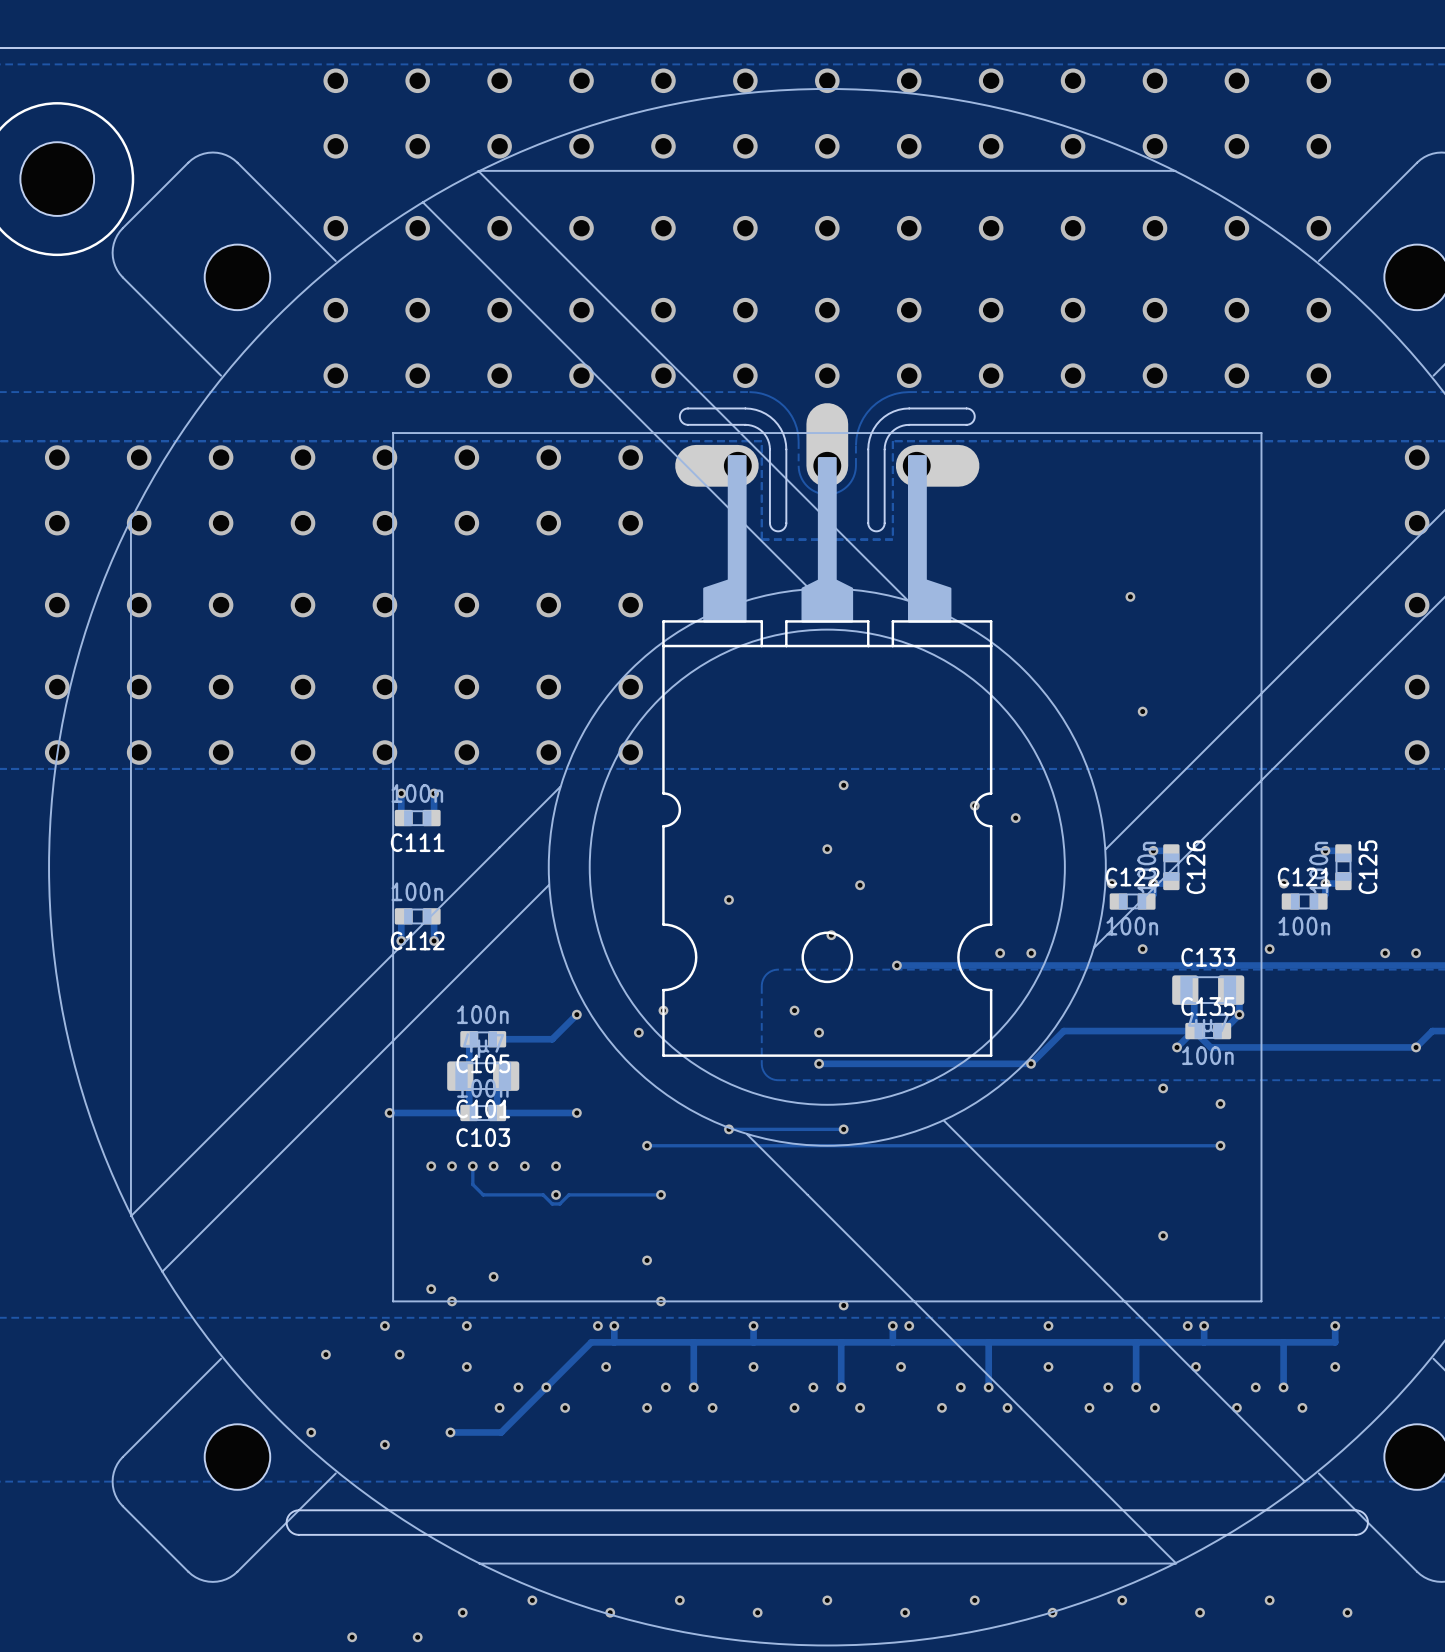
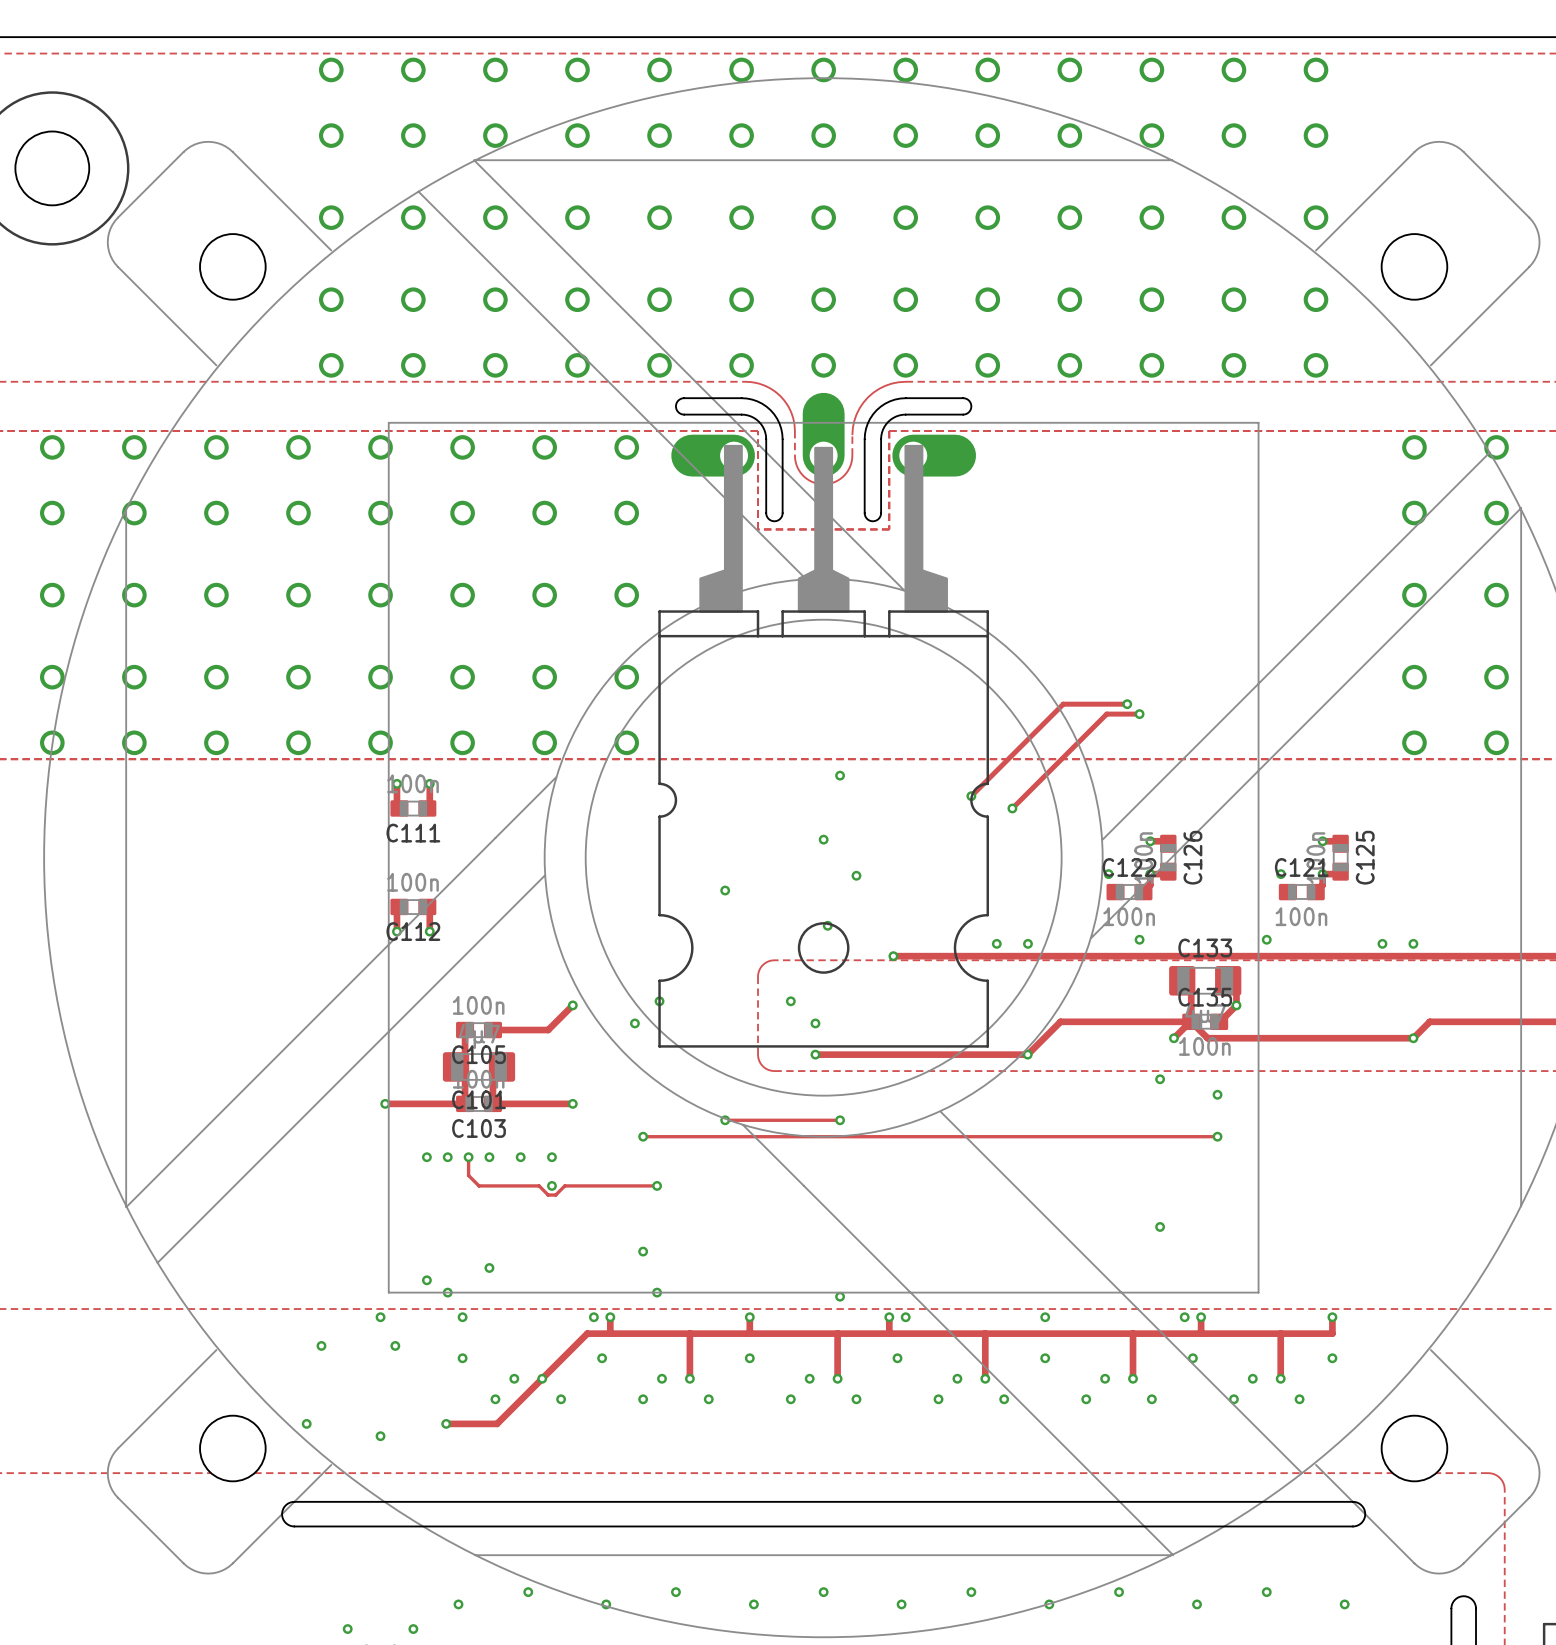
via: (1130, 596) -> none
via: (1142, 711) -> none
track: none -> (1127, 704) (1063, 704) (971, 796)
via: none -> (1127, 704)
track: none -> (1139, 714) (1106, 714) (1012, 808)
via: none -> (1139, 714)

